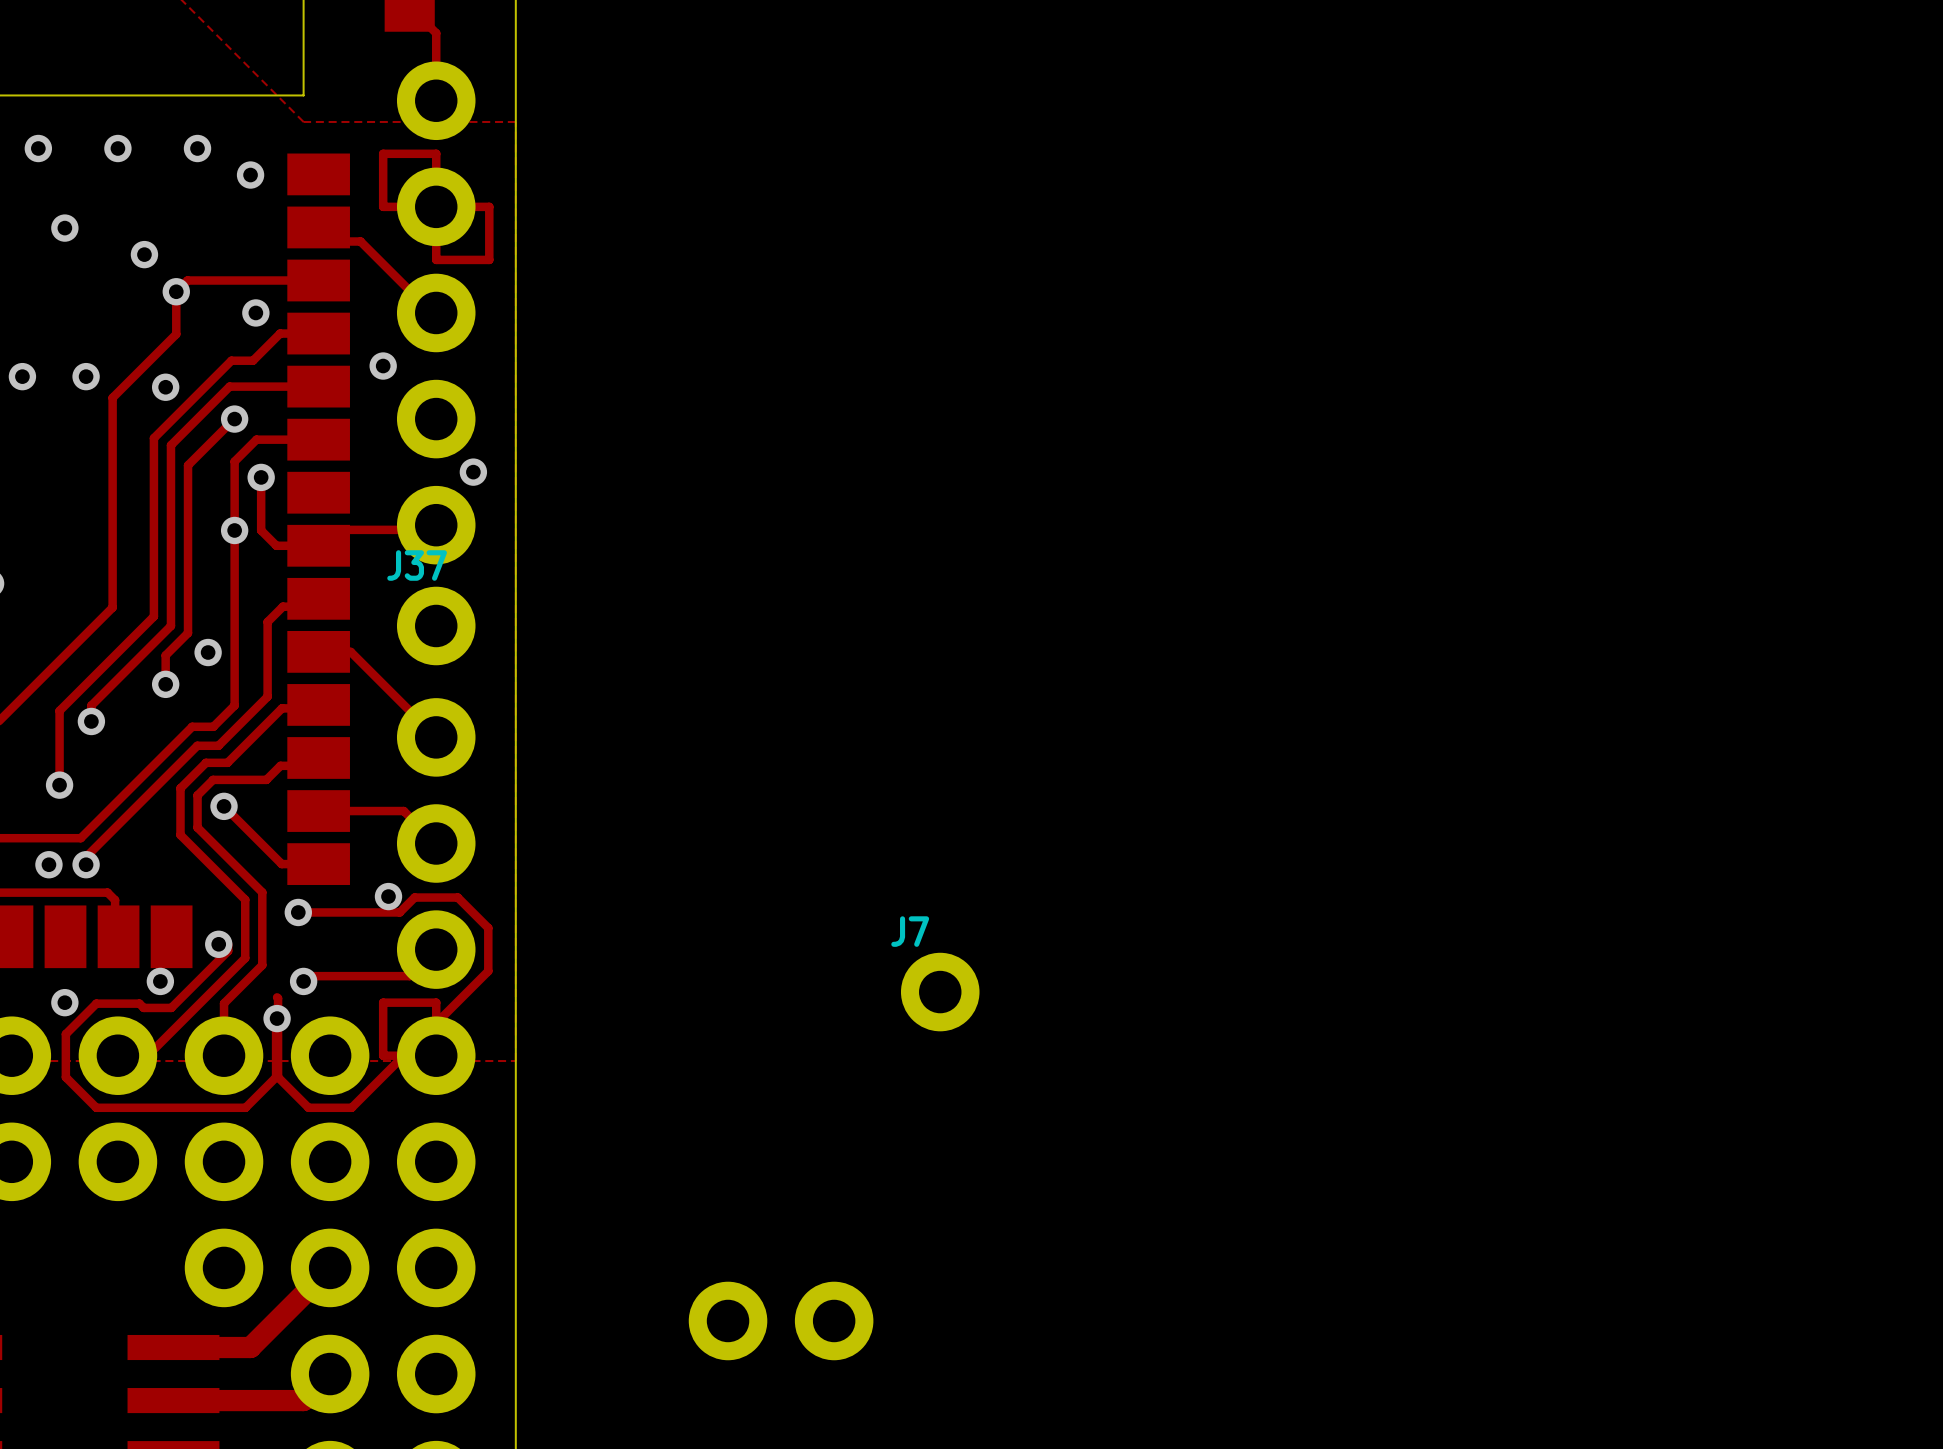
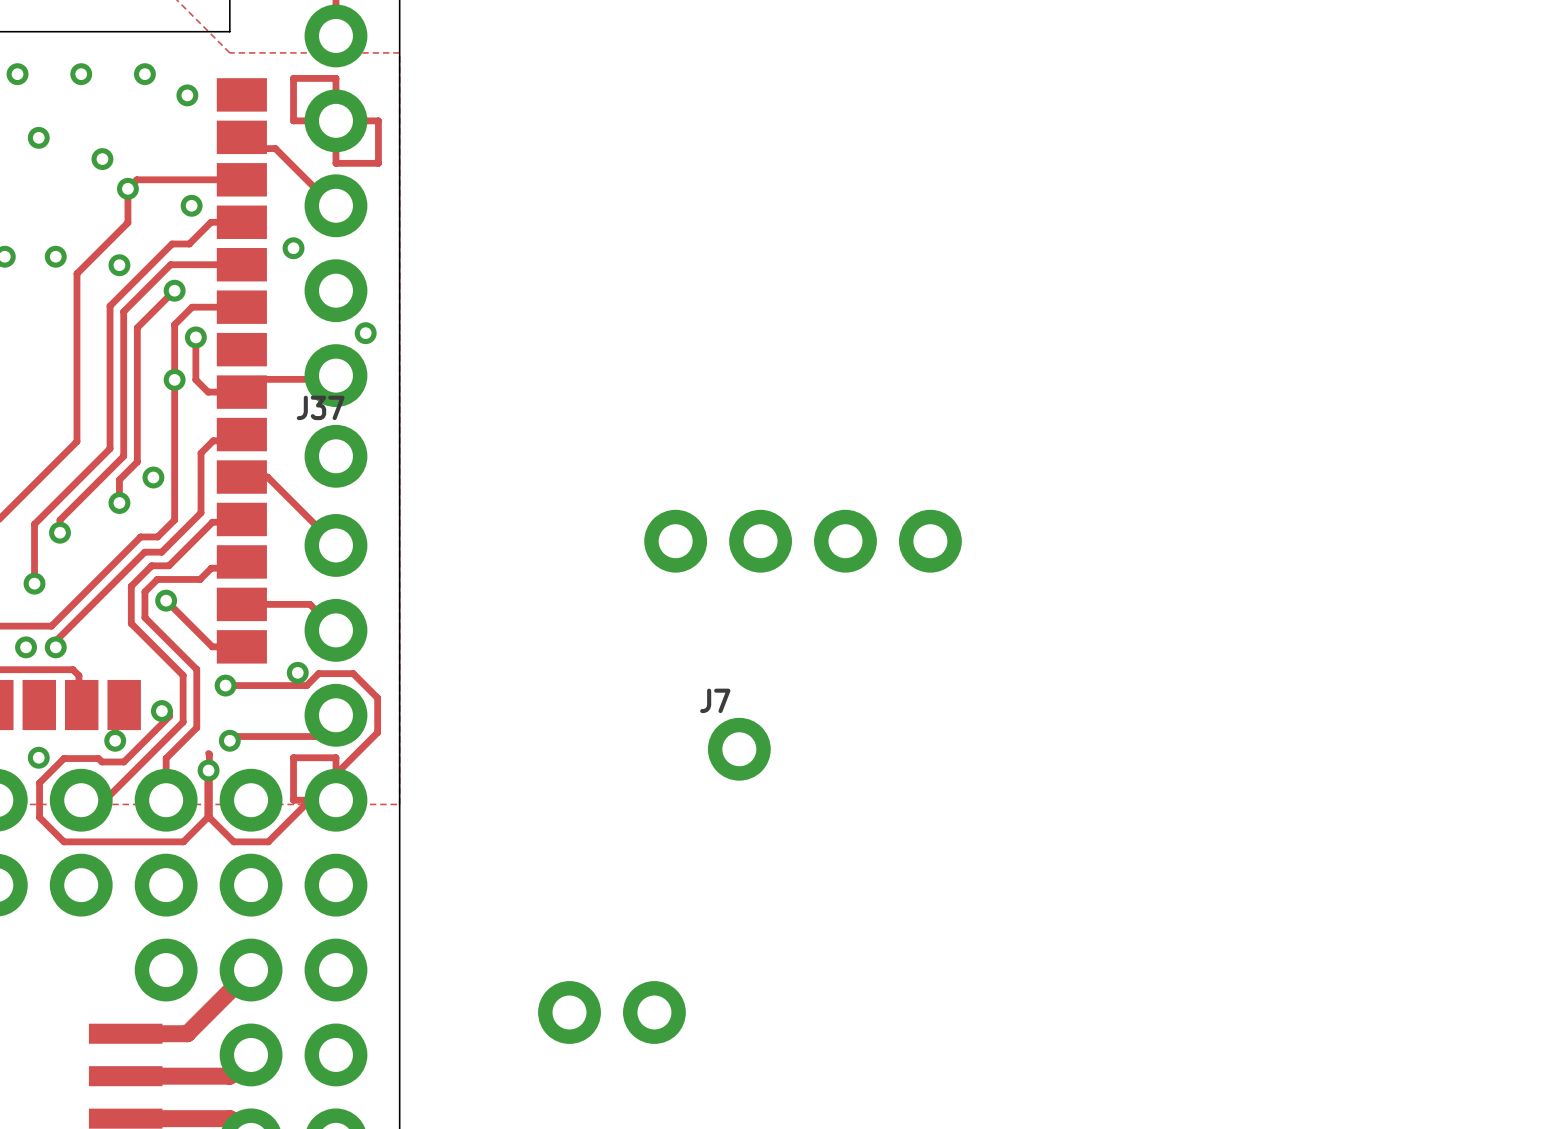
part: none -> (803, 541)

